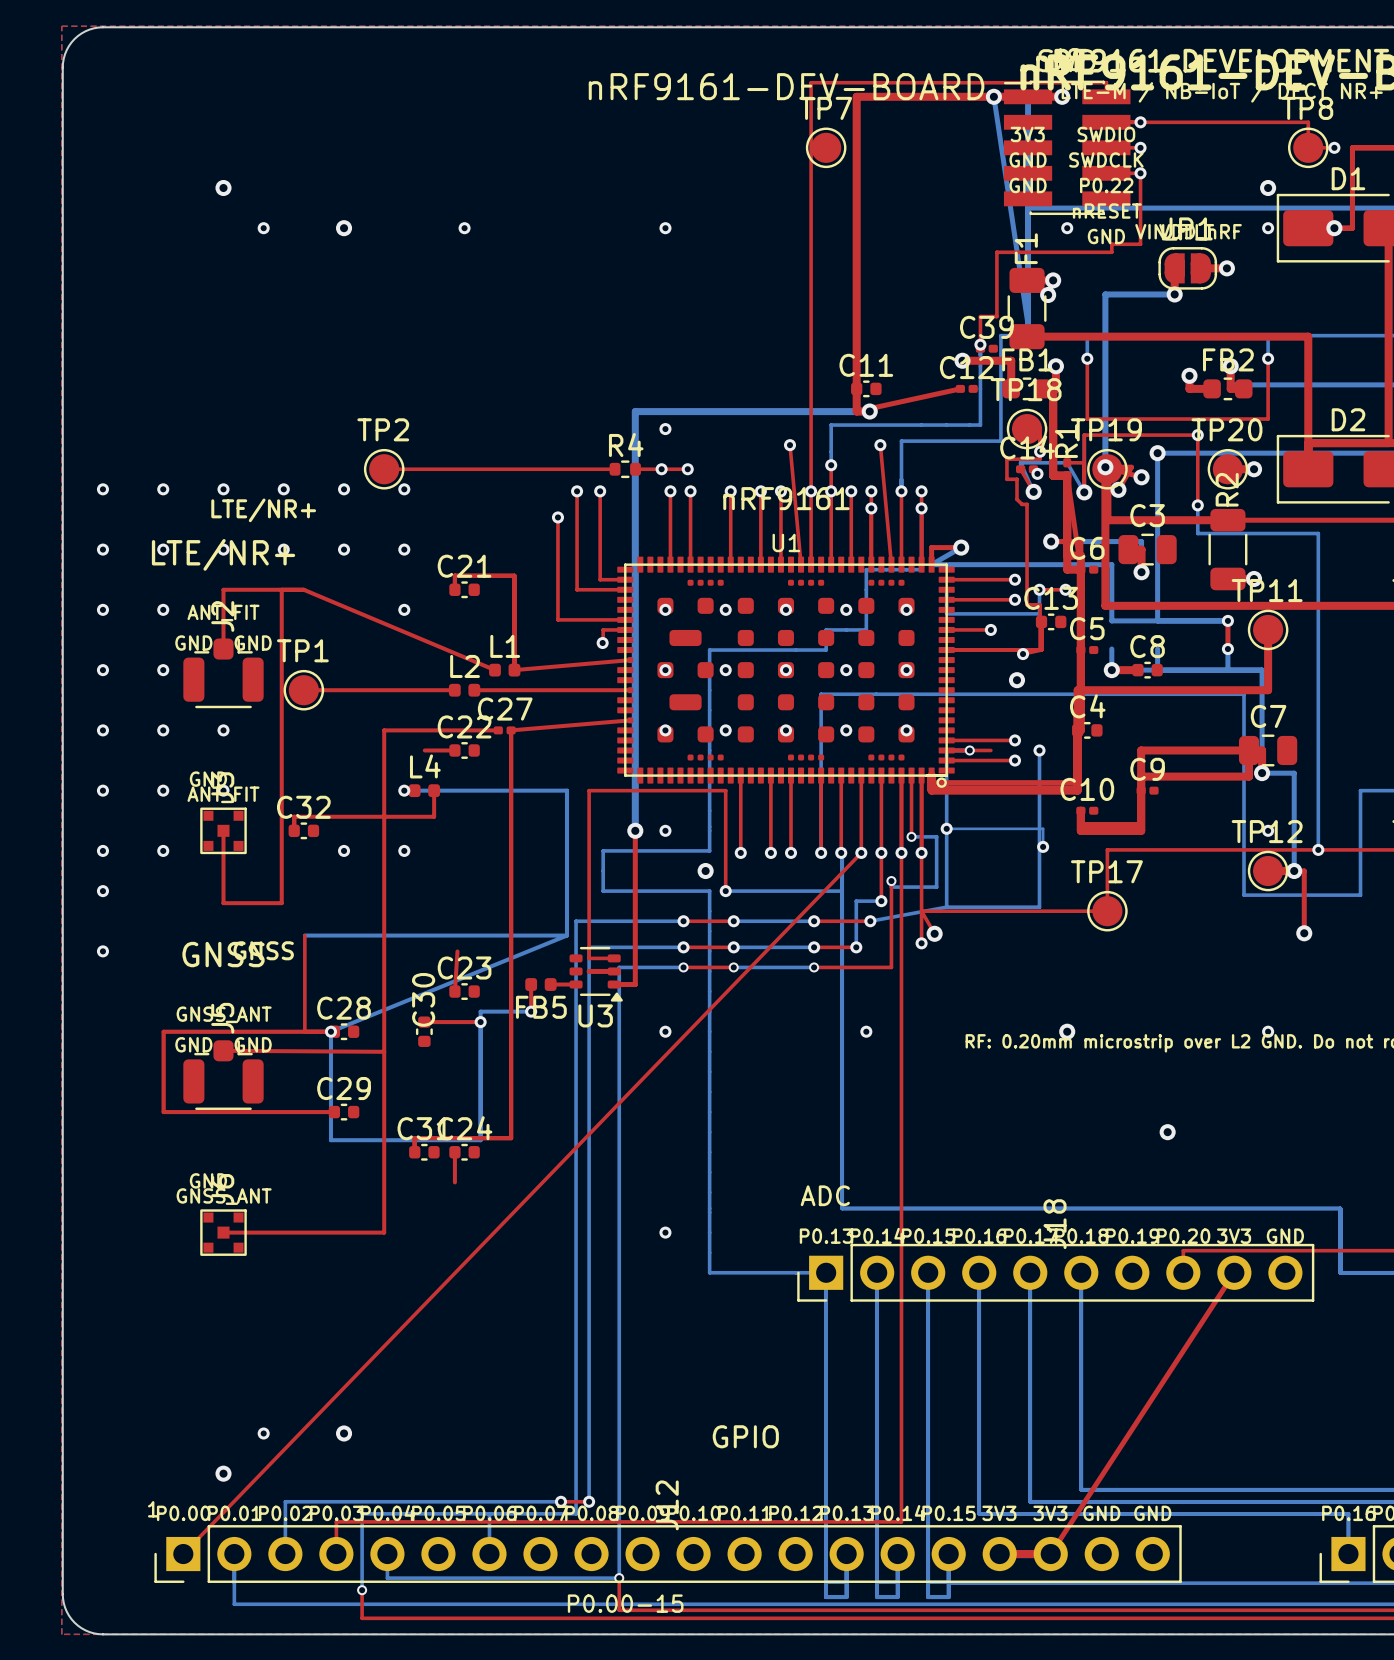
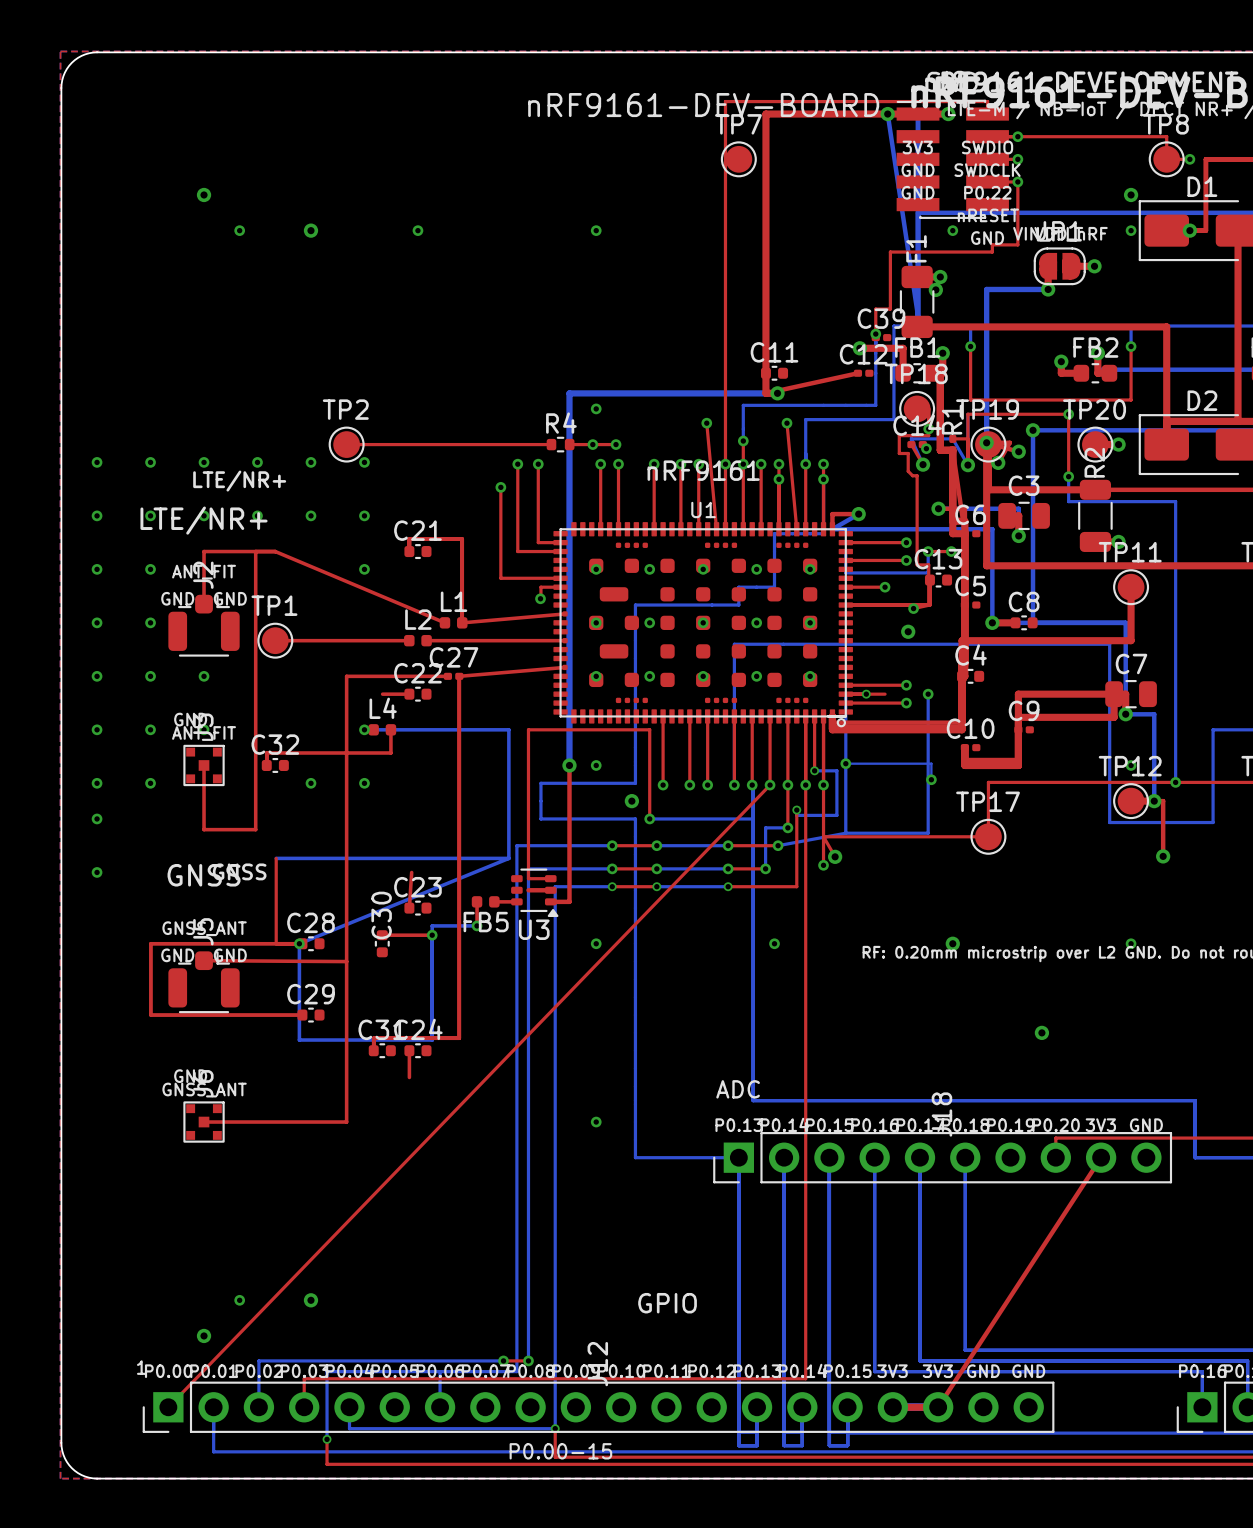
bottom track: (1111, 620) (1227, 620) -> (992, 579) (992, 604)
bottom track: none -> (1033, 579) (1033, 604)
top track: (1227, 620) (1227, 649) -> none
via: (1227, 620) -> none
bottom track: (1227, 649) (1227, 670) -> none
via: (1227, 649) -> none

